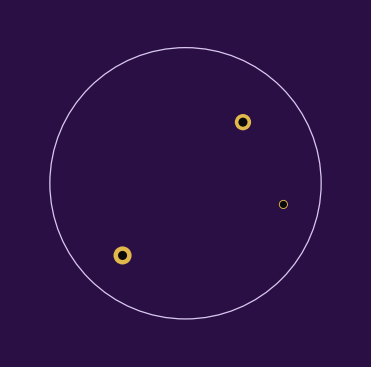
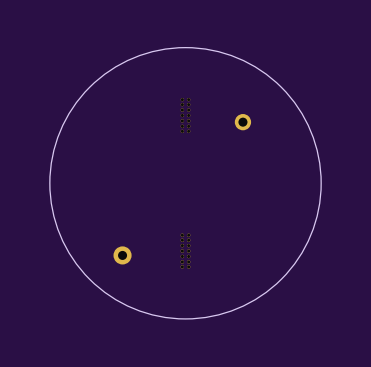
part: none -> (185, 115)
part: (283, 204) -> none
part: none -> (185, 251)

